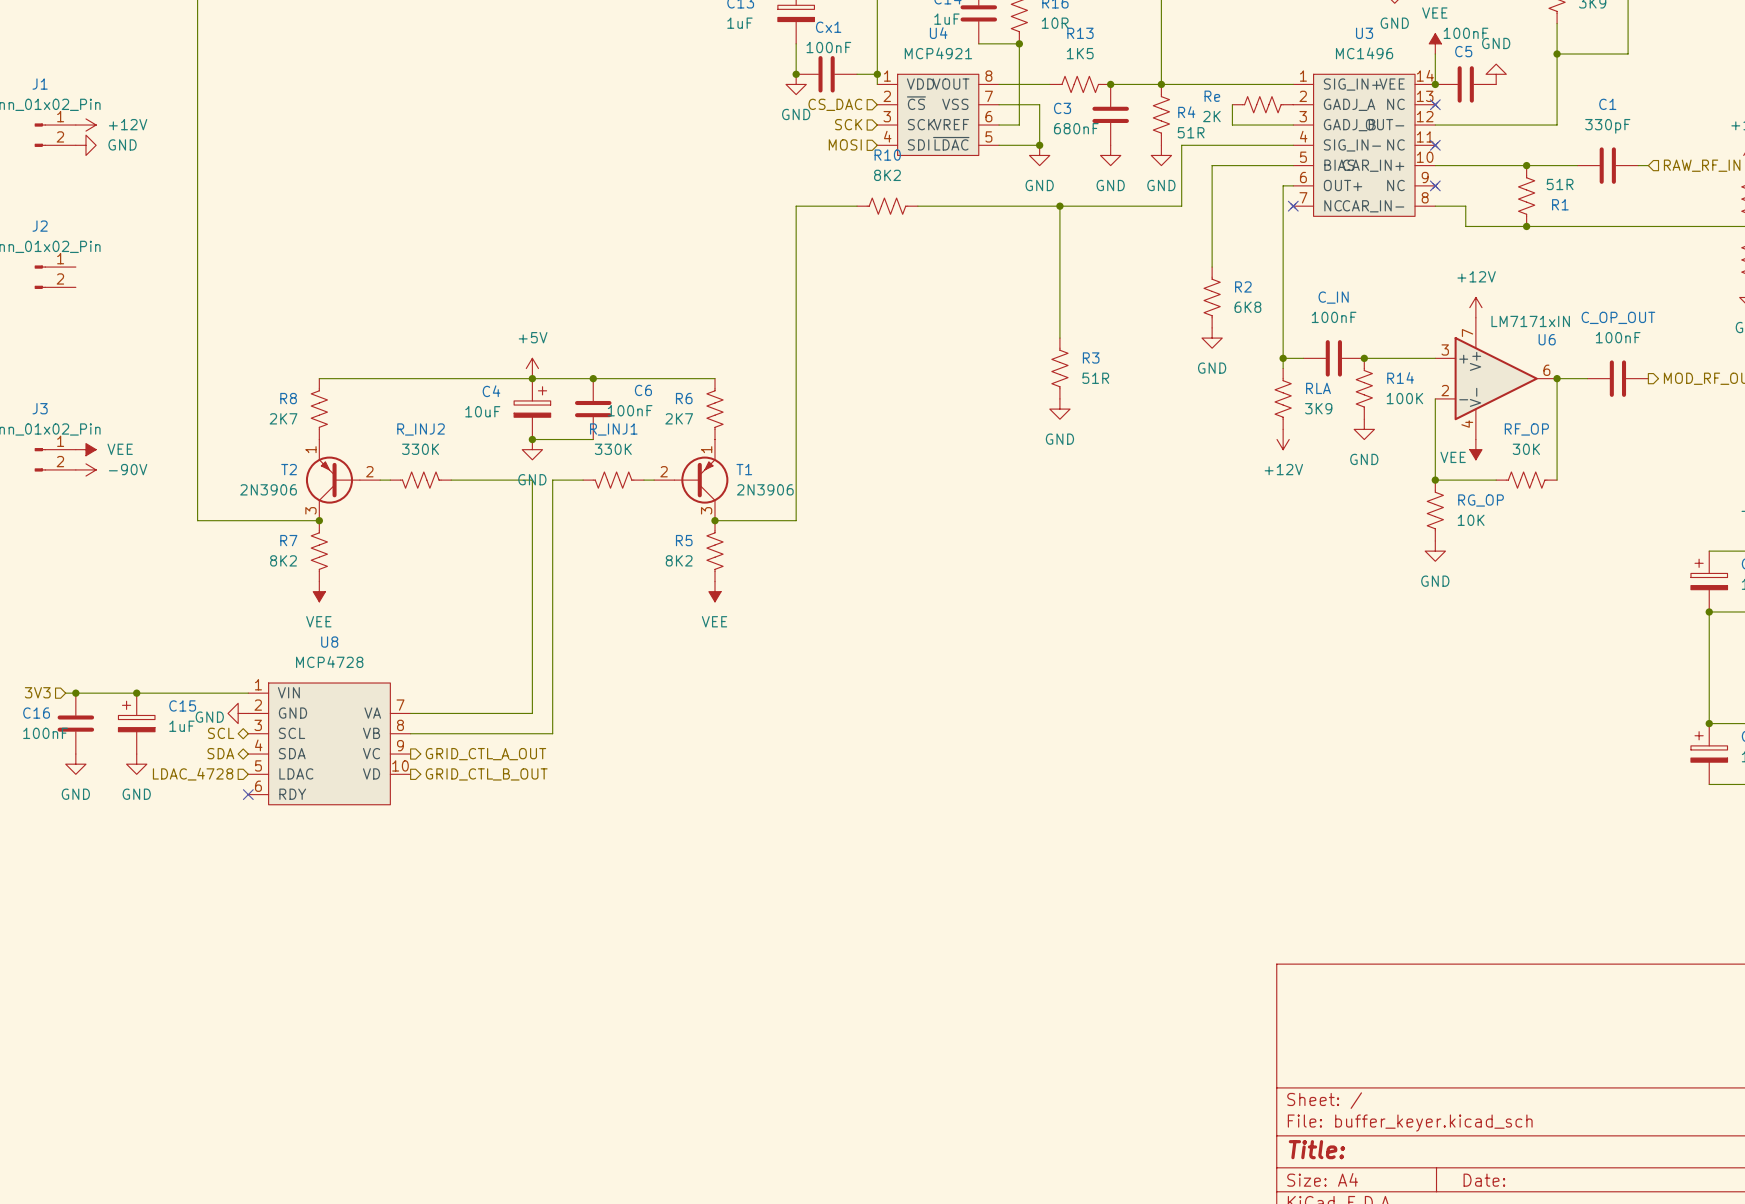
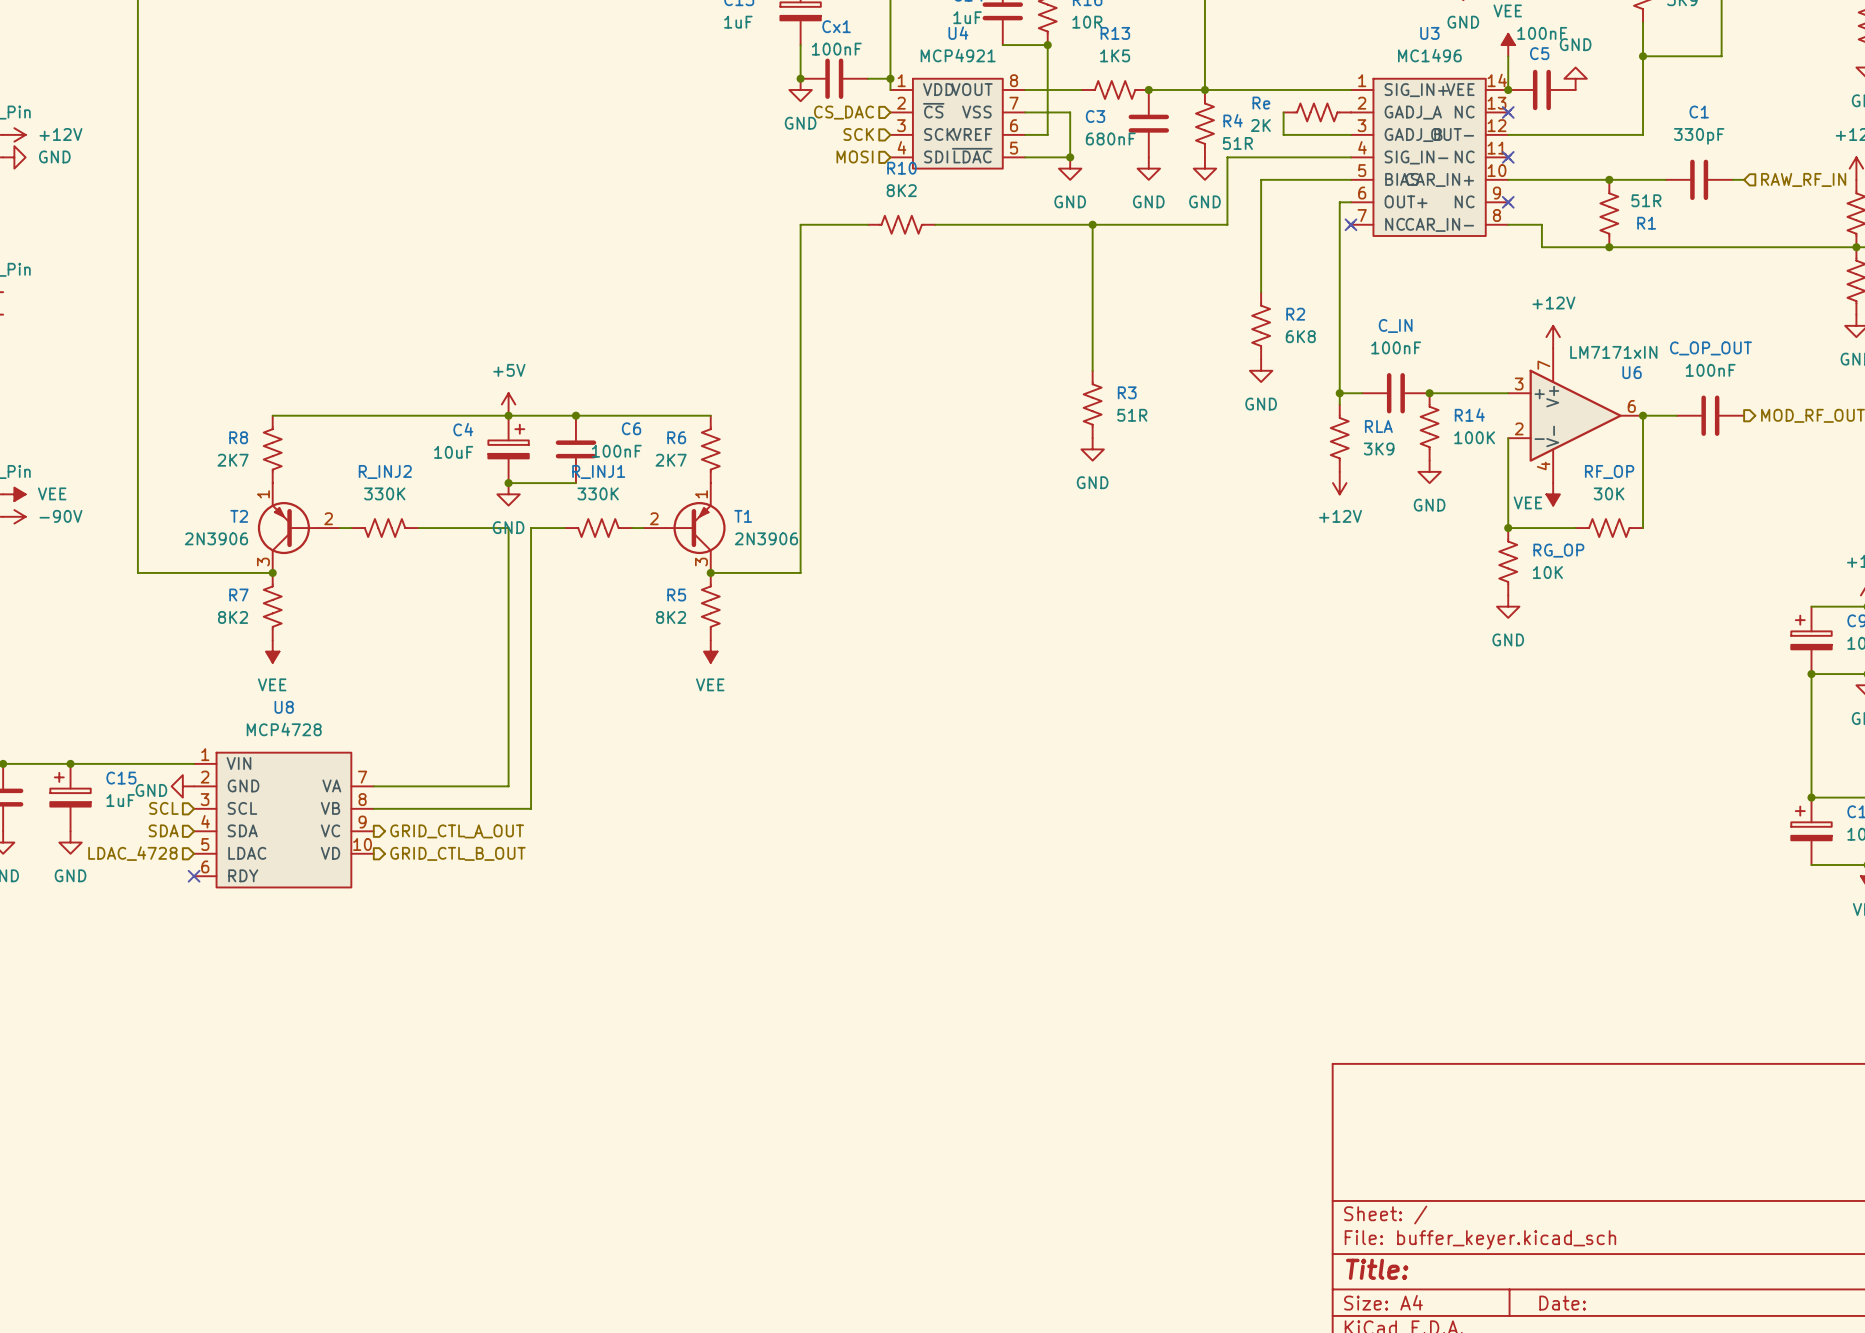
hierarchical label shape: bidirectional (221, 733) -> input (163, 808)
hierarchical label shape: bidirectional (220, 753) -> input (163, 830)

